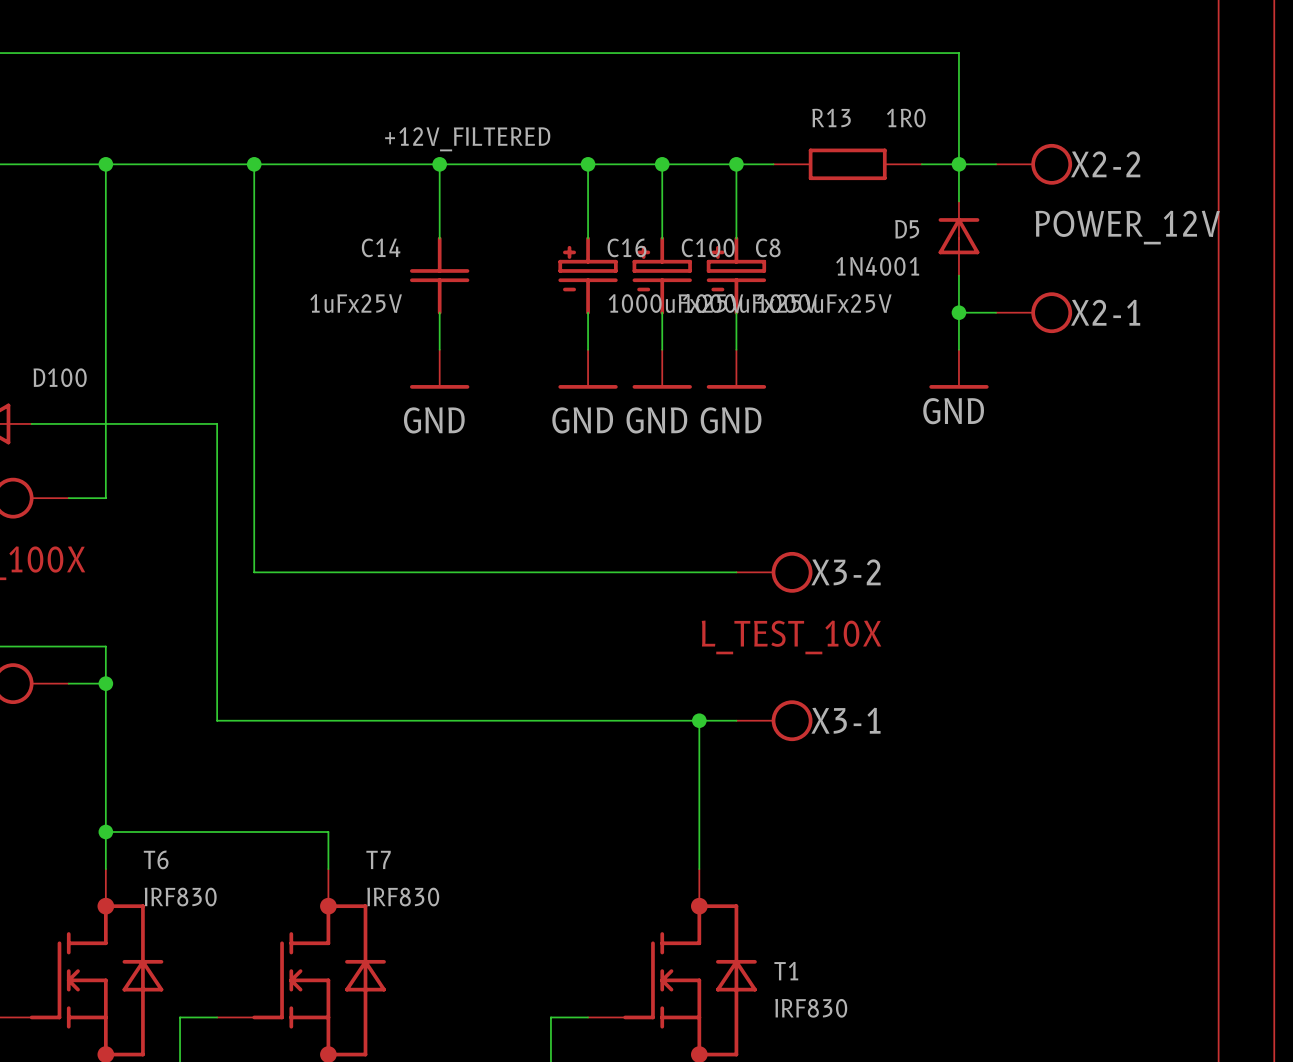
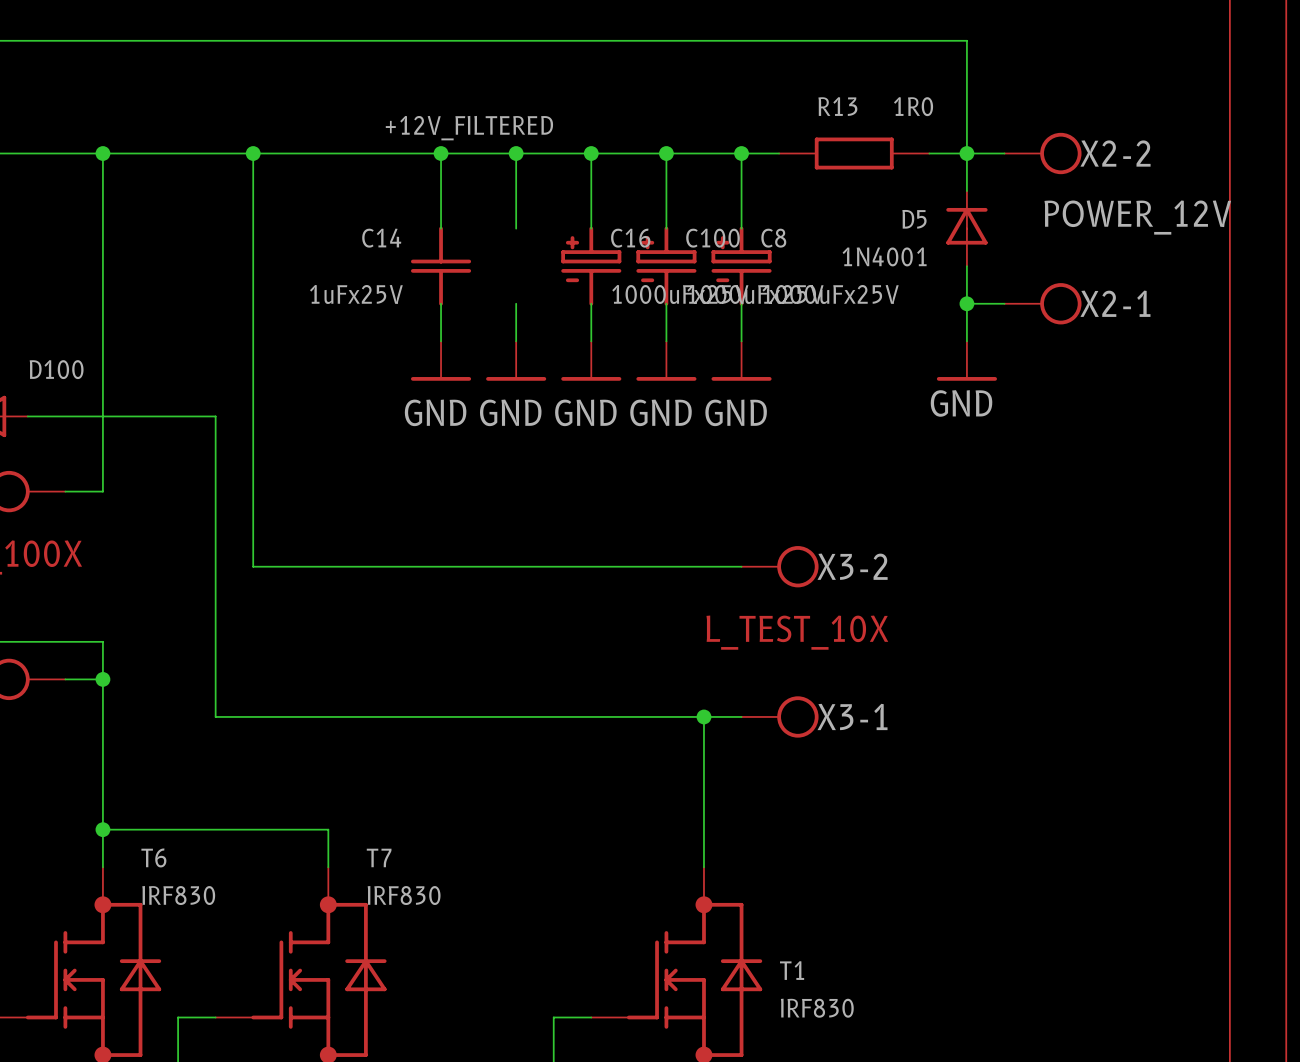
wire: none -> (516, 153) (516, 228)
junction: none -> (516, 153)
wire: none -> (516, 303) (516, 341)
power symbol: none -> GND (516, 361)

